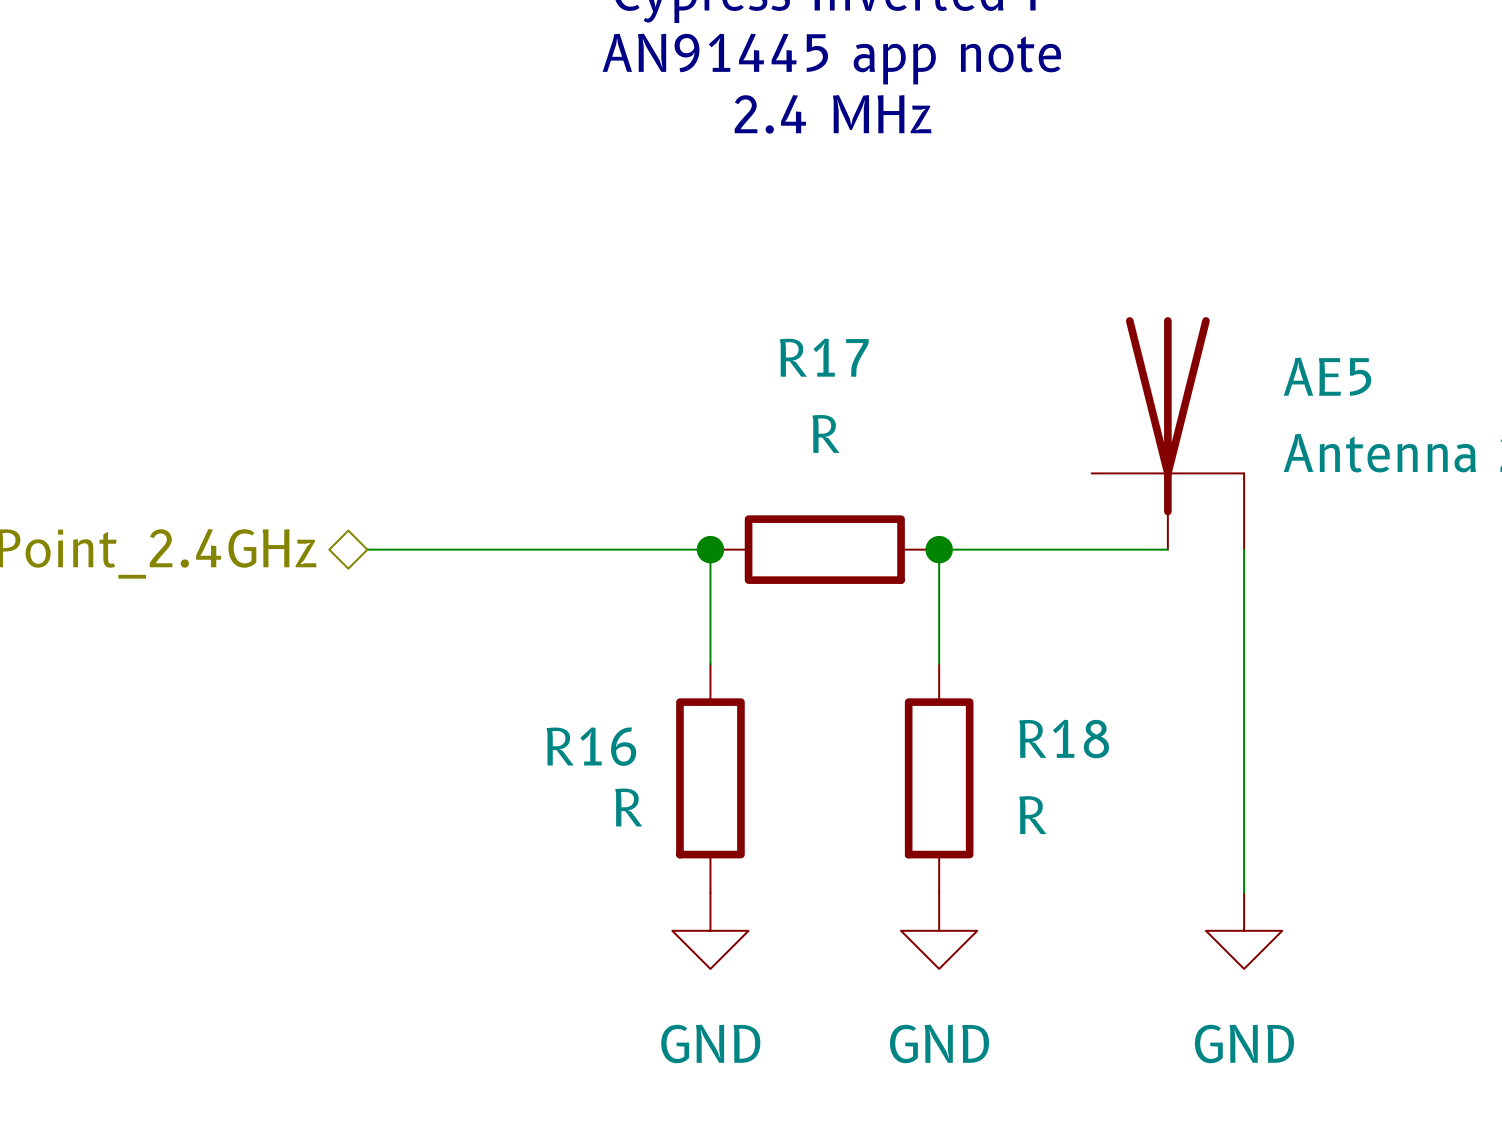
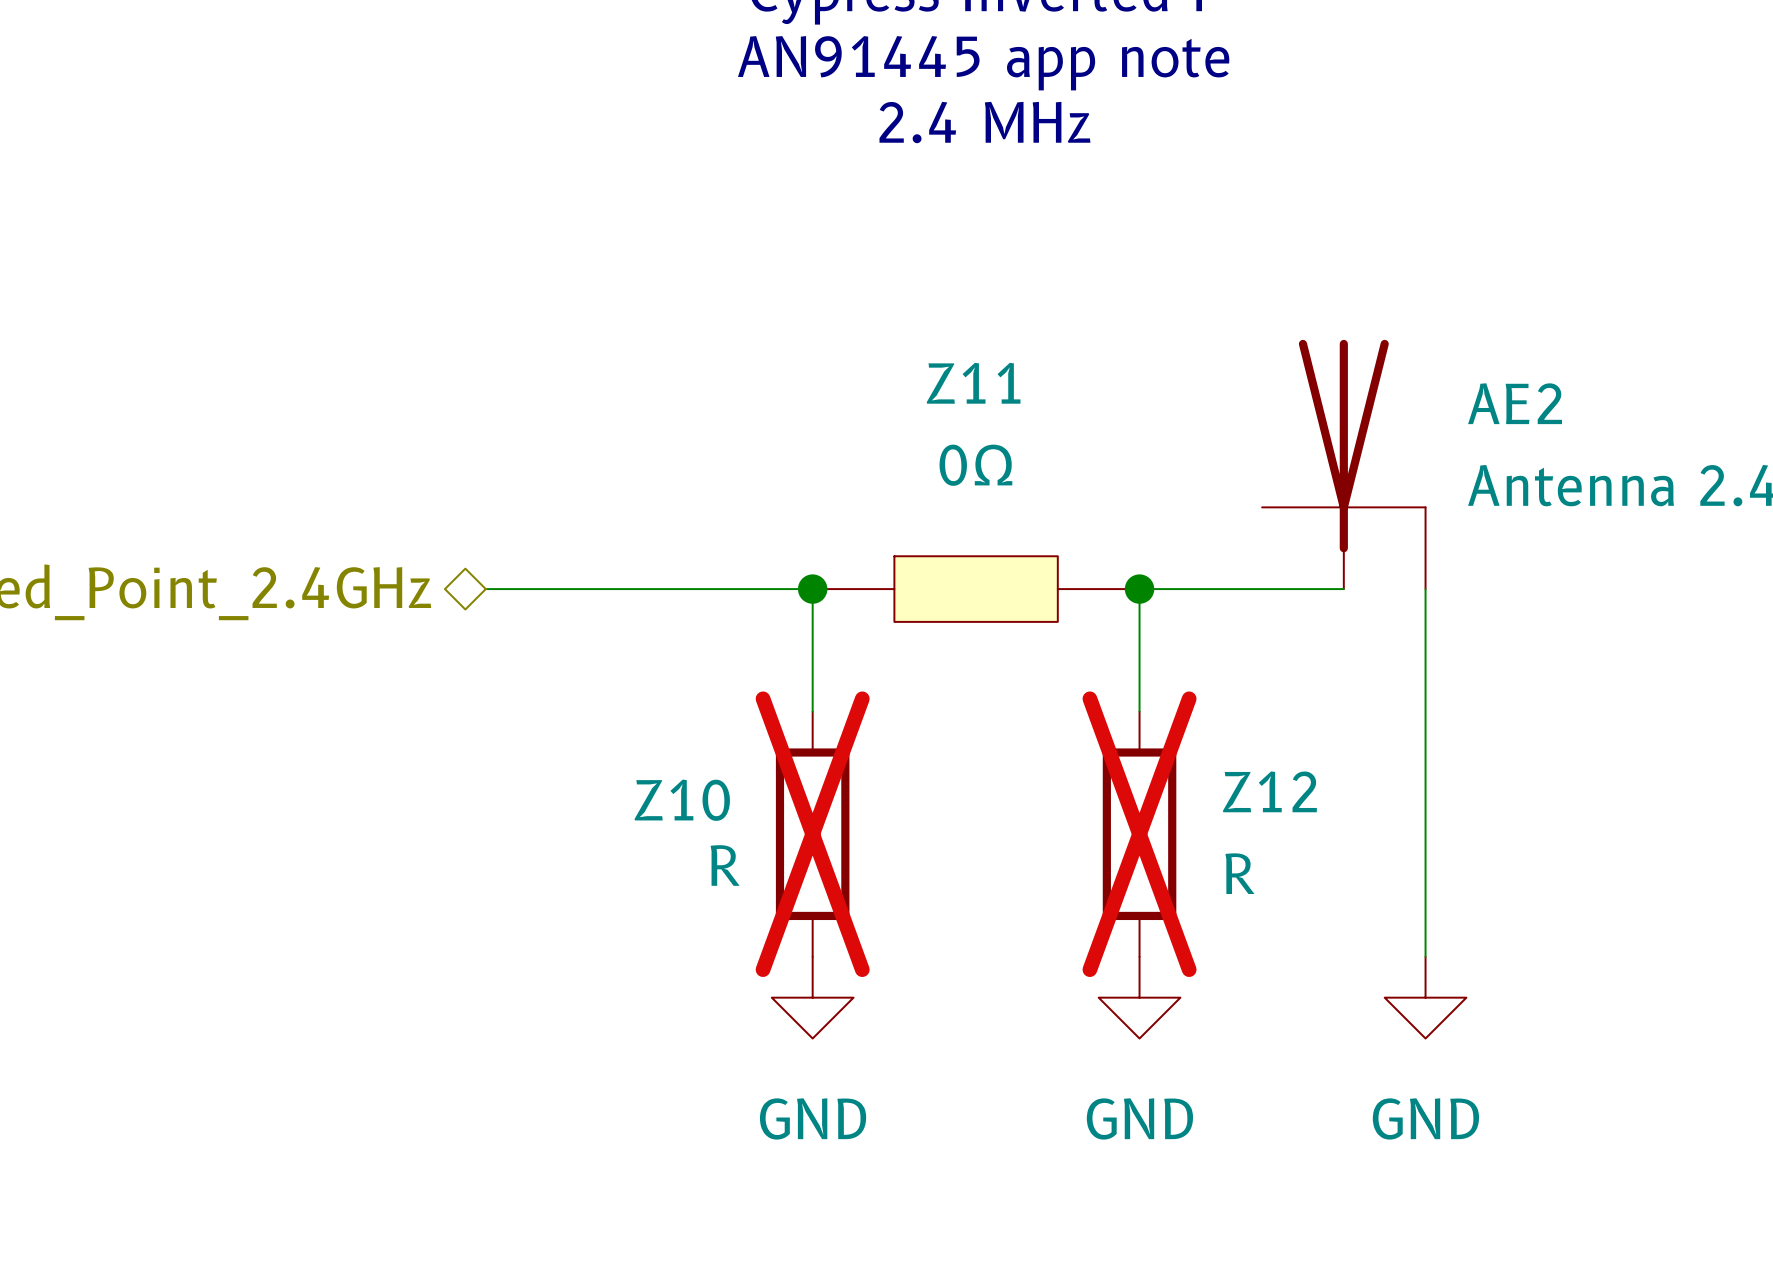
AE5 name: AE5 (1327, 376) -> AE2 (1515, 403)
wire: (672, 549) (710, 549) (710, 663) -> (812, 589) (812, 711)
junction position: (710, 549) -> (812, 589)
R17: R (824, 549) -> none
Z11: none -> 0Ω (976, 589)
junction position: (939, 549) -> (1139, 589)
wire: (977, 549) (939, 549) (939, 663) -> (1139, 589) (1139, 711)
Z10: none -> R (812, 834)
R16: R (710, 778) -> none
R18: R (939, 778) -> none
Z12: none -> R (1139, 834)
power symbol position: GND (710, 930) -> GND (812, 997)
power symbol position: GND (939, 930) -> GND (1139, 997)

